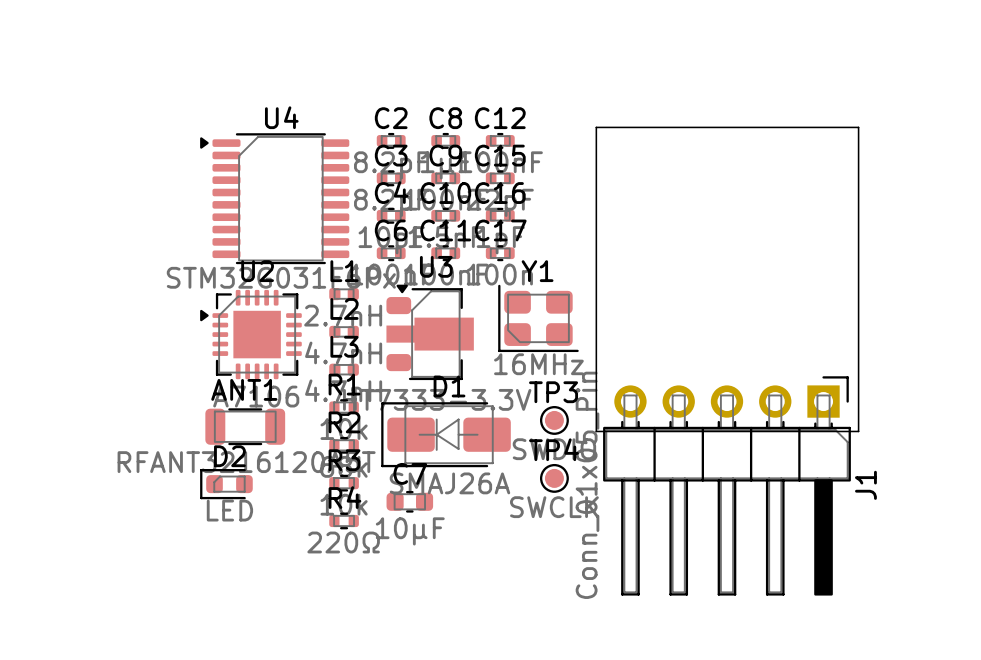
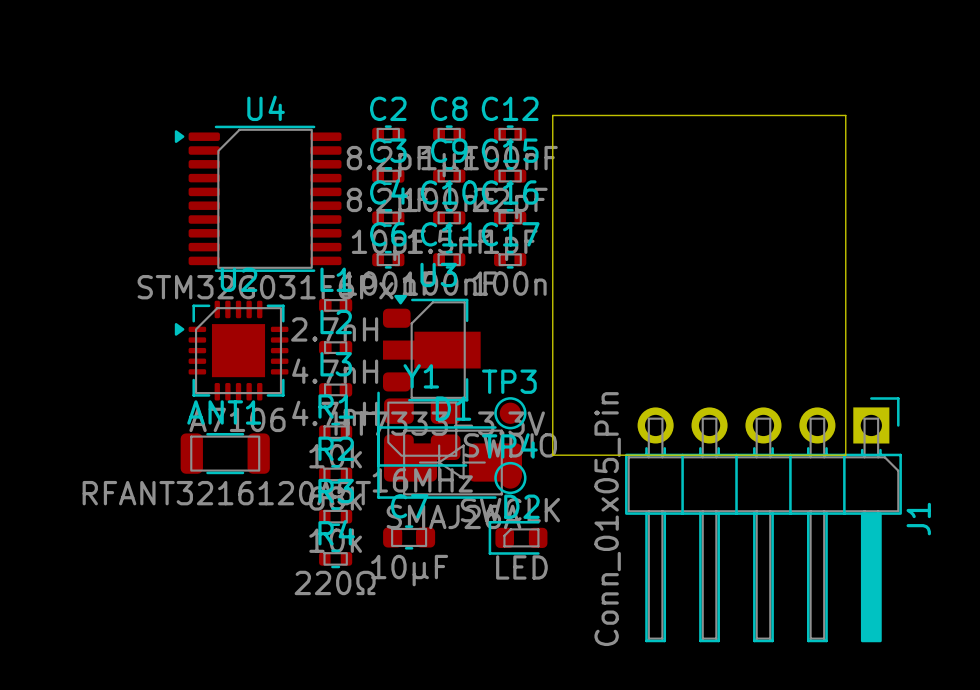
board edge: (596, 127) (858, 127) (858, 431) (596, 431) (596, 127) -> (552, 115) (845, 115) (845, 455) (552, 455) (552, 115)
Y1 position: (538, 318) -> (422, 429)
TP3 position: (554, 420) -> (510, 413)
TP4 position: (554, 478) -> (510, 478)
D2 position: (226, 484) -> (518, 537)

